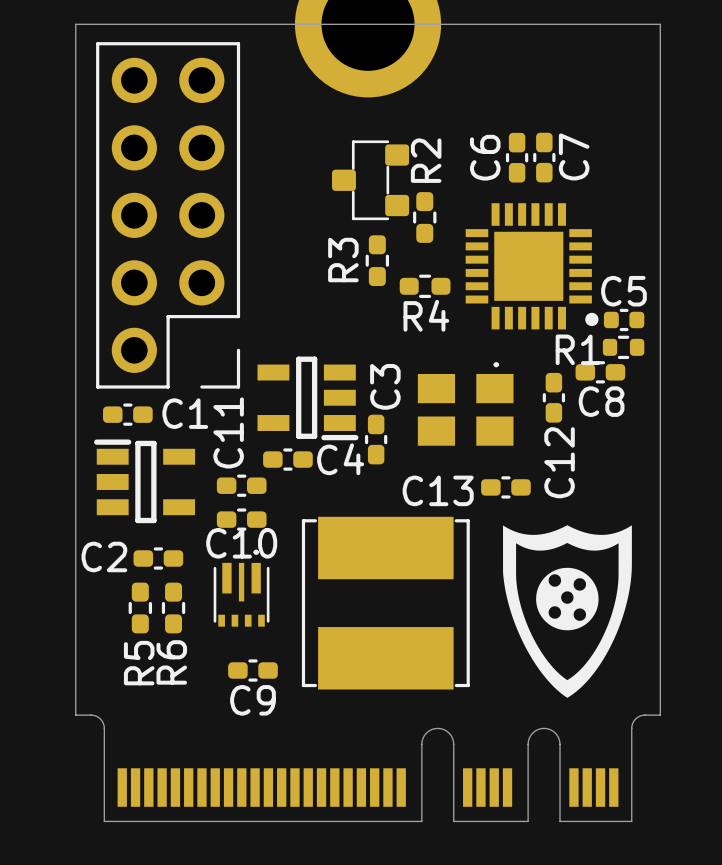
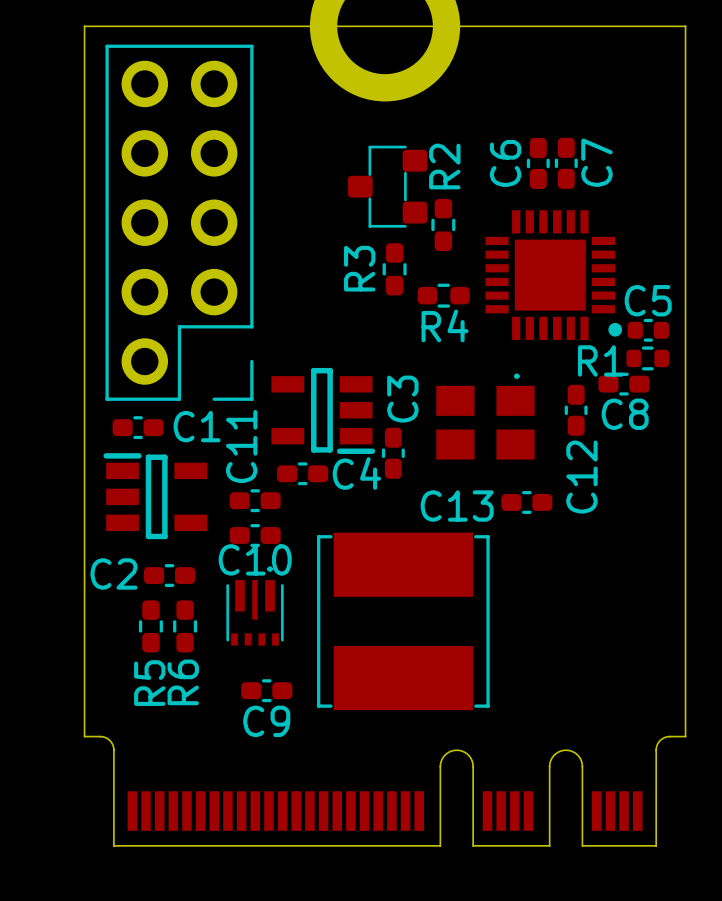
drawing: [503, 525, 632, 698] -> none

